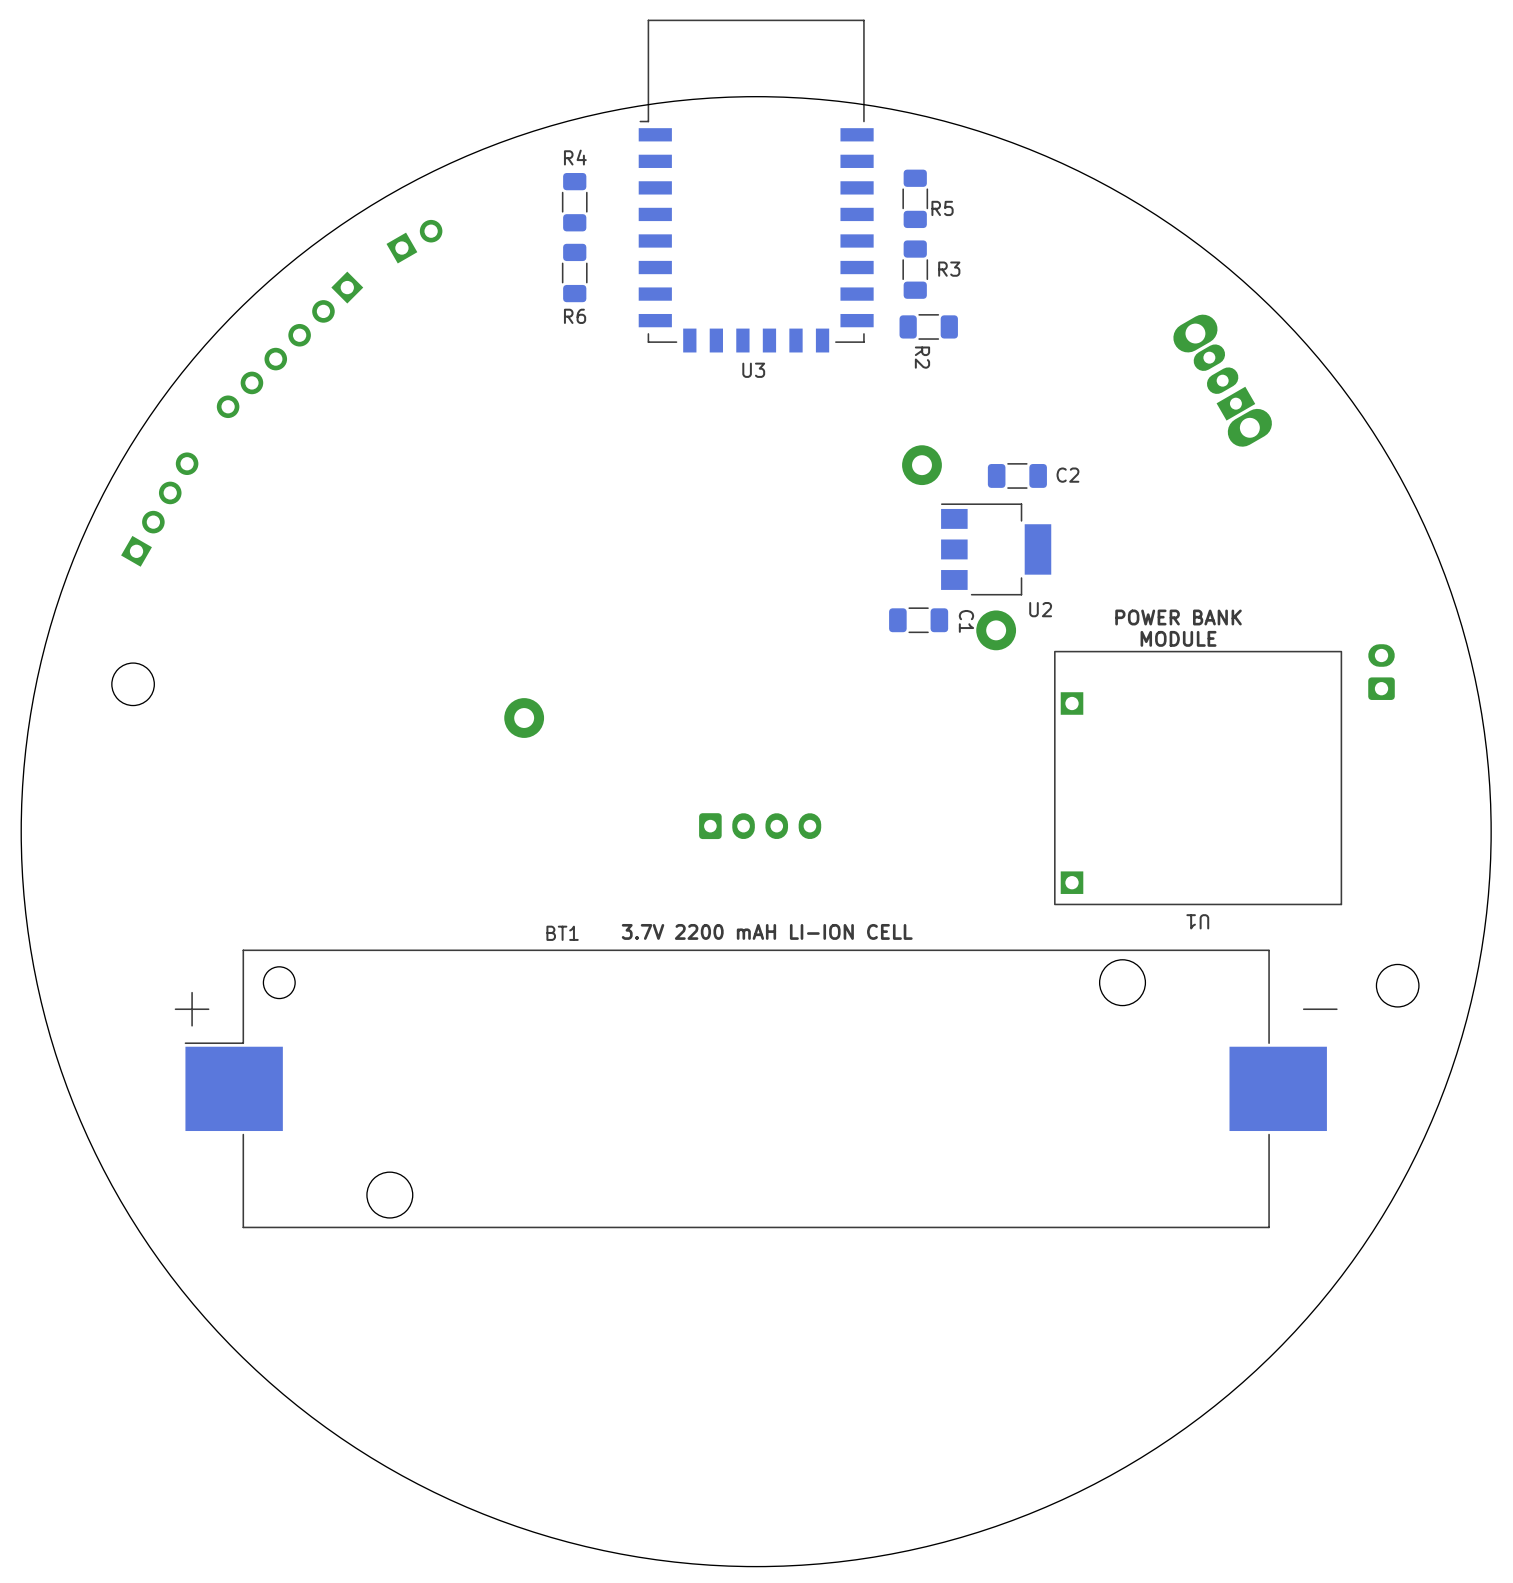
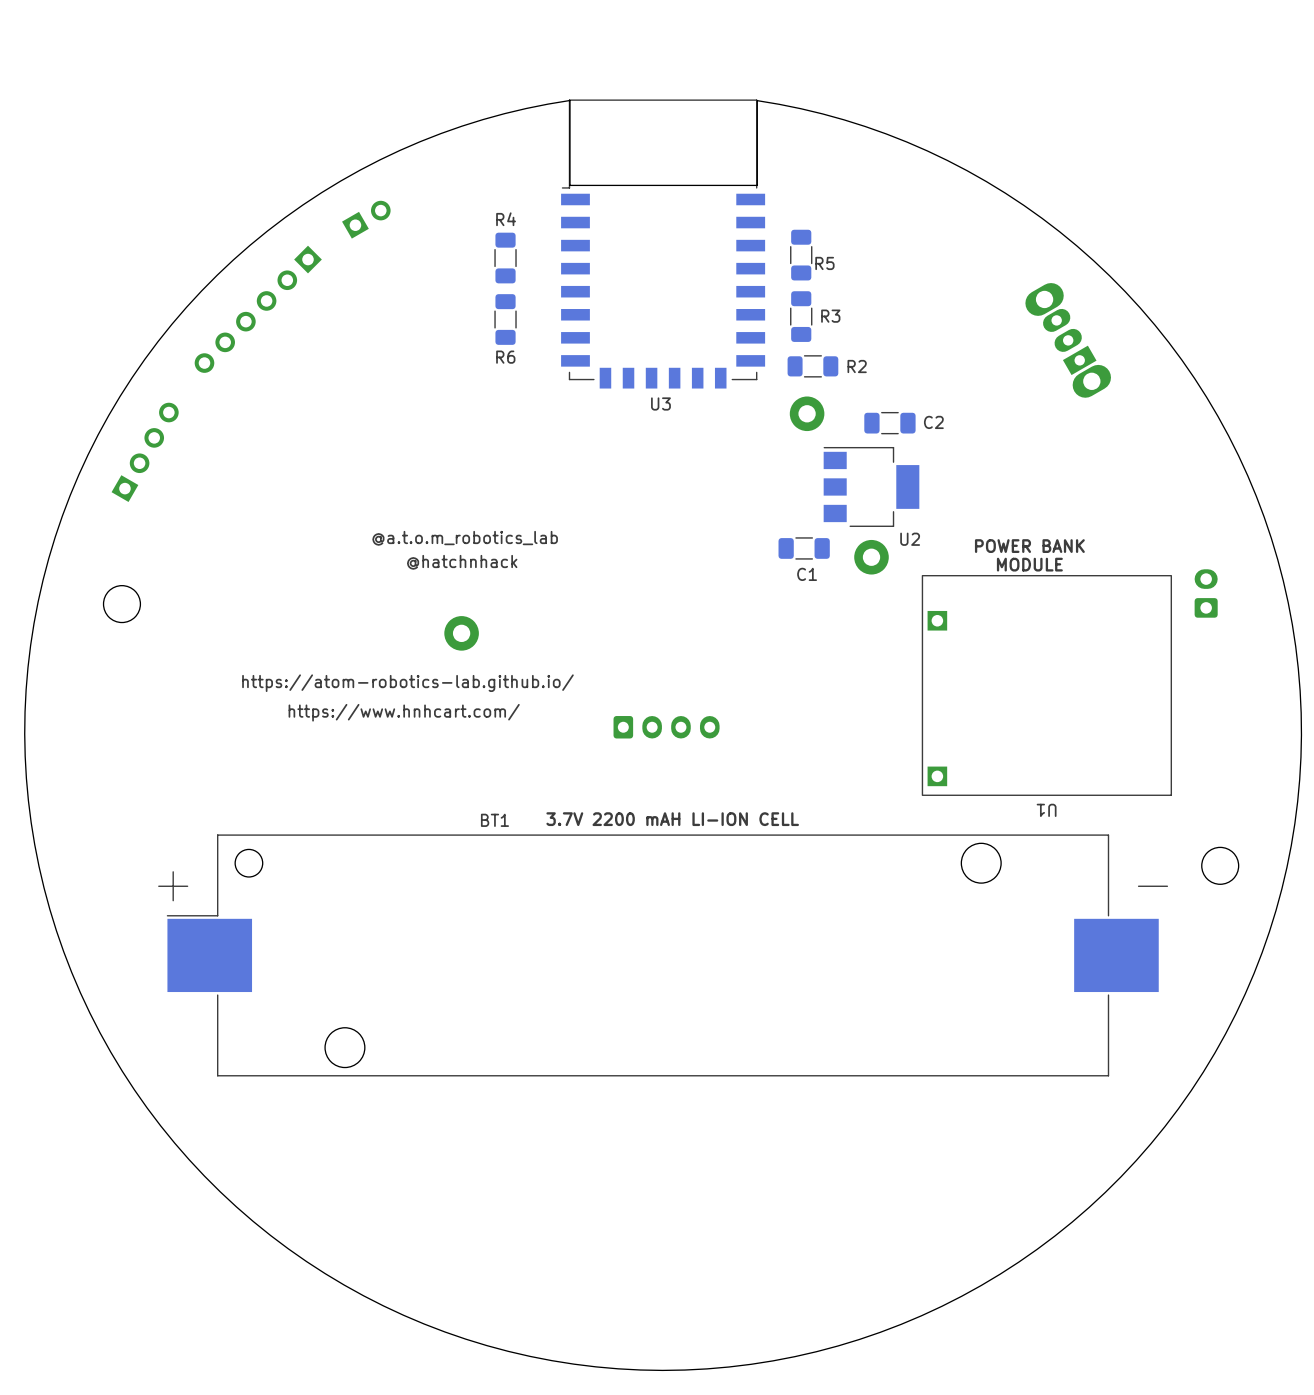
round board edge: [20, 96, 1492, 1568] -> none
board edge: none -> (569, 100) (569, 185) (757, 185) (757, 100) (822, 113) (865, 126) (906, 142) (947, 160) (986, 181) (1042, 218) (1076, 245) (1125, 291) (1168, 342) (1206, 397) (1238, 455) (1264, 517) (1283, 580) (1295, 646) (1301, 712) (1299, 779) (1291, 845) (1276, 910) (1254, 973) (1235, 1013) (1203, 1072) (1164, 1126) (1136, 1160) (1088, 1207) (1037, 1249) (981, 1285) (921, 1315) (880, 1332) (816, 1351) (751, 1364) (706, 1368) (640, 1370) (573, 1364) (508, 1351) (444, 1331) (383, 1305) (325, 1273) (270, 1235) (236, 1206) (189, 1159) (147, 1108) (110, 1052) (80, 992) (56, 930) (39, 866) (31, 822) (25, 756) (26, 689) (34, 623) (43, 579) (62, 516) (88, 454) (120, 396) (158, 341) (201, 290) (233, 259) (284, 217) (340, 181) (399, 150) (440, 133) (504, 113) (569, 100)
U3 position: (756, 186) -> (663, 243)
R5 position: (915, 198) -> (801, 255)
R4 position: (574, 202) -> (505, 258)
R3 position: (915, 269) -> (801, 316)
R6 position: (574, 272) -> (505, 319)
R2 position: (928, 326) -> (812, 366)
R2 name rotation: 0° (922, 357) -> 90° counterclockwise (857, 366)
R2 name position: R2 (922, 357) -> R2 (857, 366)
text: none -> @a.t.o.m_robotics_lab (465, 538)
C1 name rotation: 0° (966, 621) -> 90° counterclockwise (807, 574)
C1 name position: C1 (966, 621) -> C1 (807, 574)
text: none -> @hatchnhack (462, 562)
text: none -> https://atom-robotics-lab.github.io/ (407, 683)
text: none -> https://www.hnhcart.com/ (404, 712)

